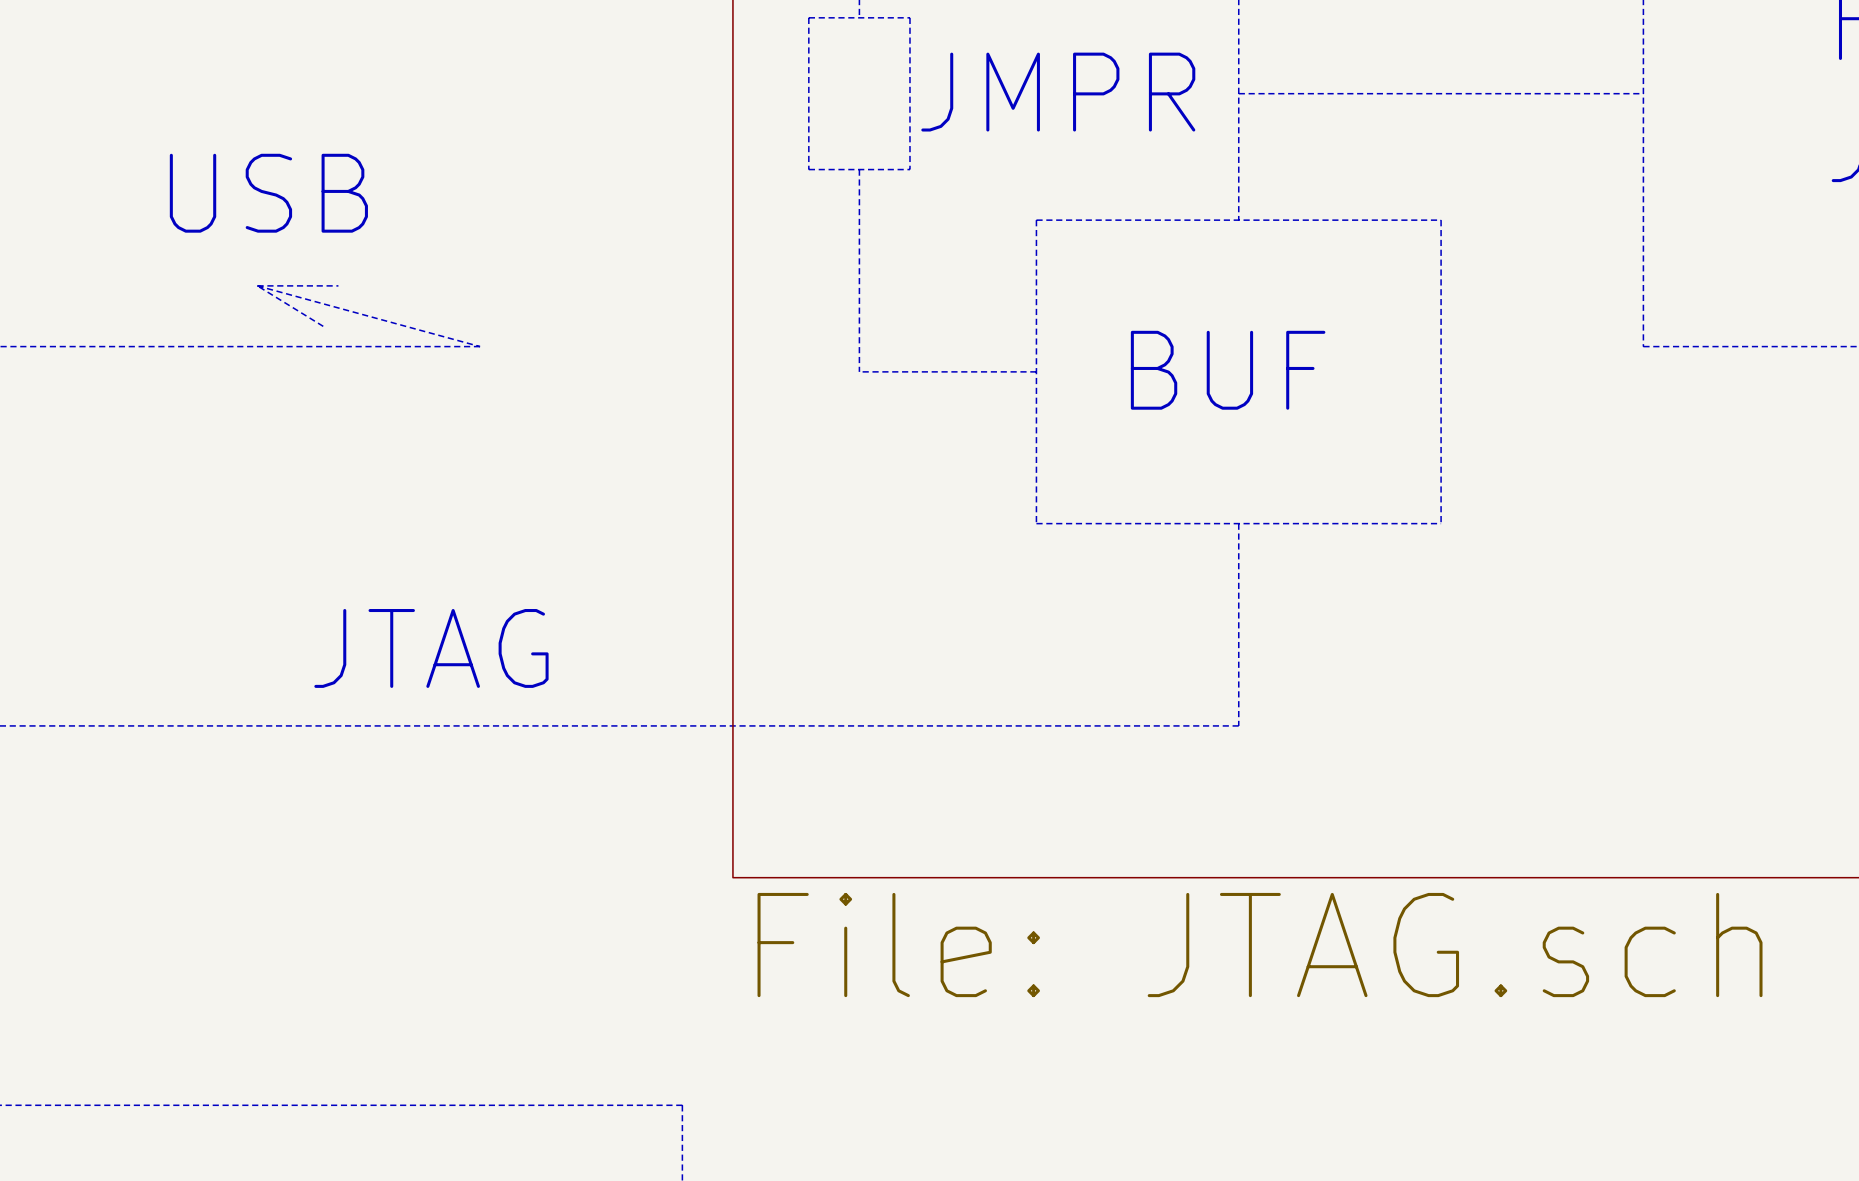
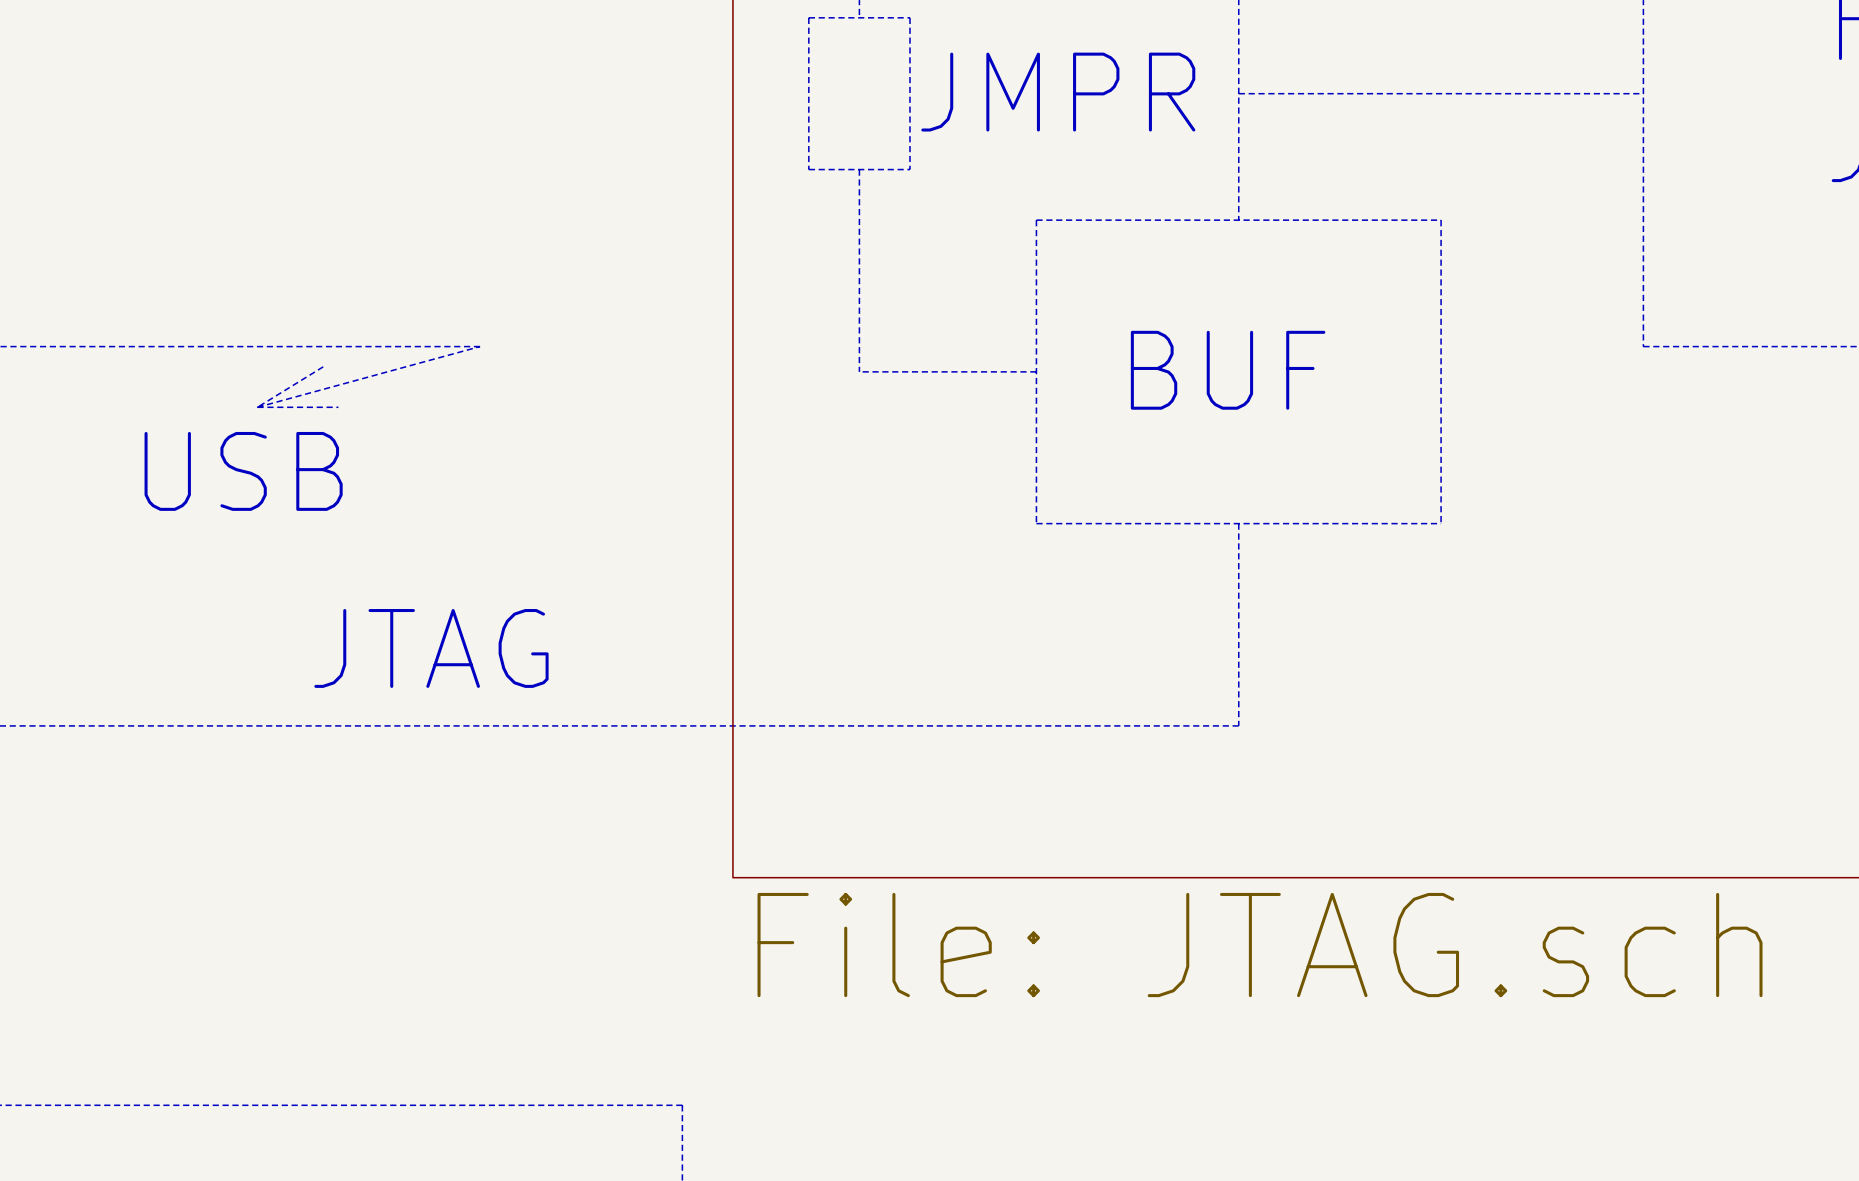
text position: USB (268, 193) -> USB (243, 471)
line: (257, 285) (480, 346) -> (257, 407) (480, 346)
line: (257, 285) (338, 285) -> (257, 407) (338, 407)
line: (257, 285) (323, 326) -> none
line: none -> (323, 366) (257, 407)

